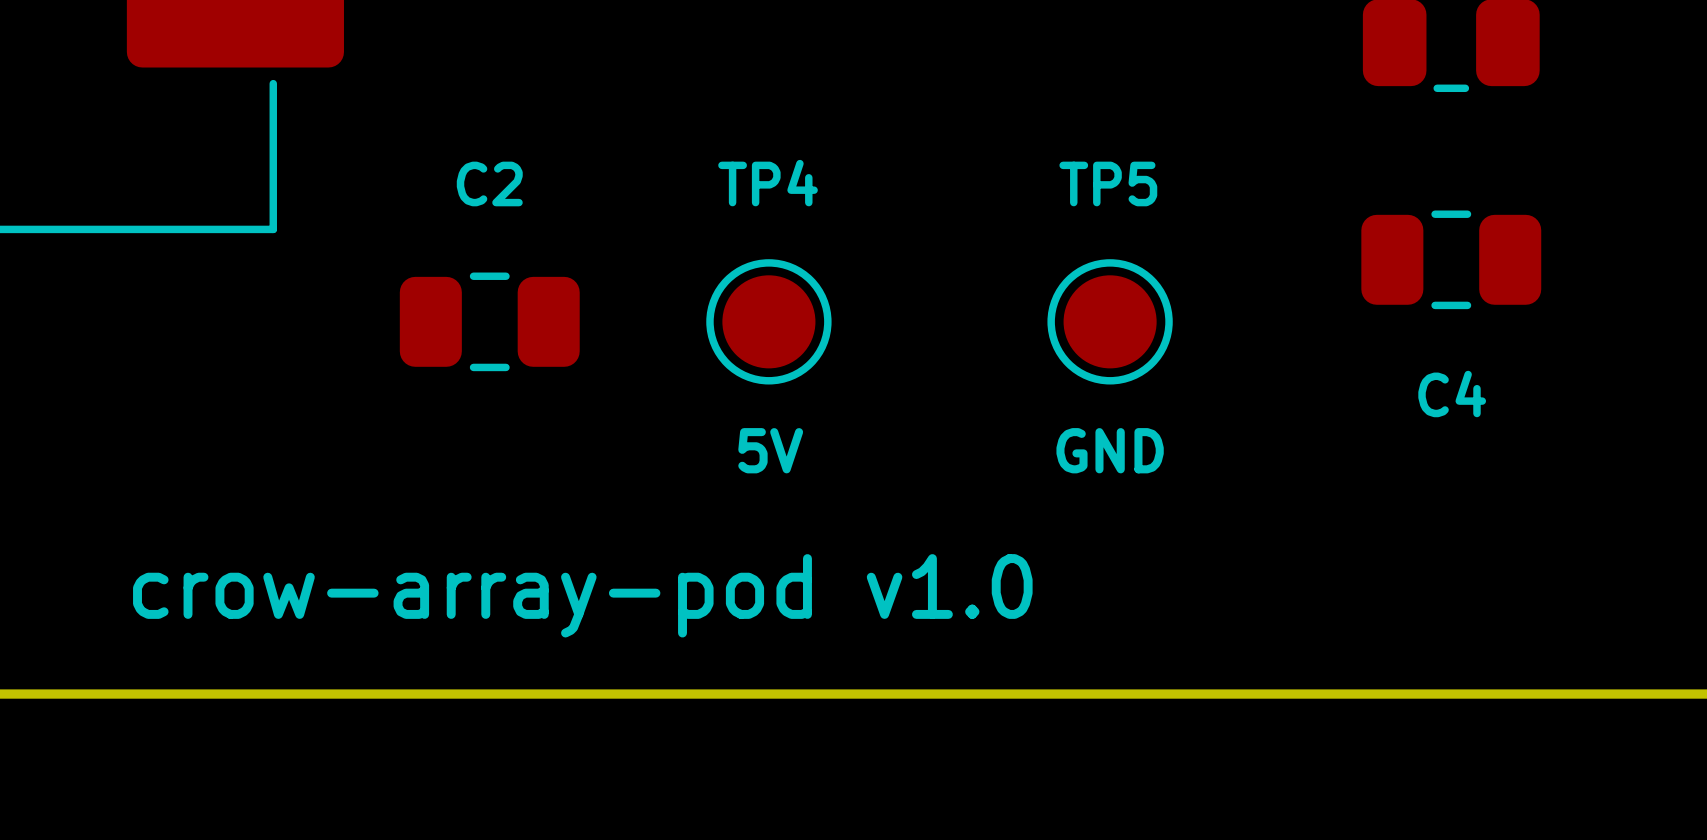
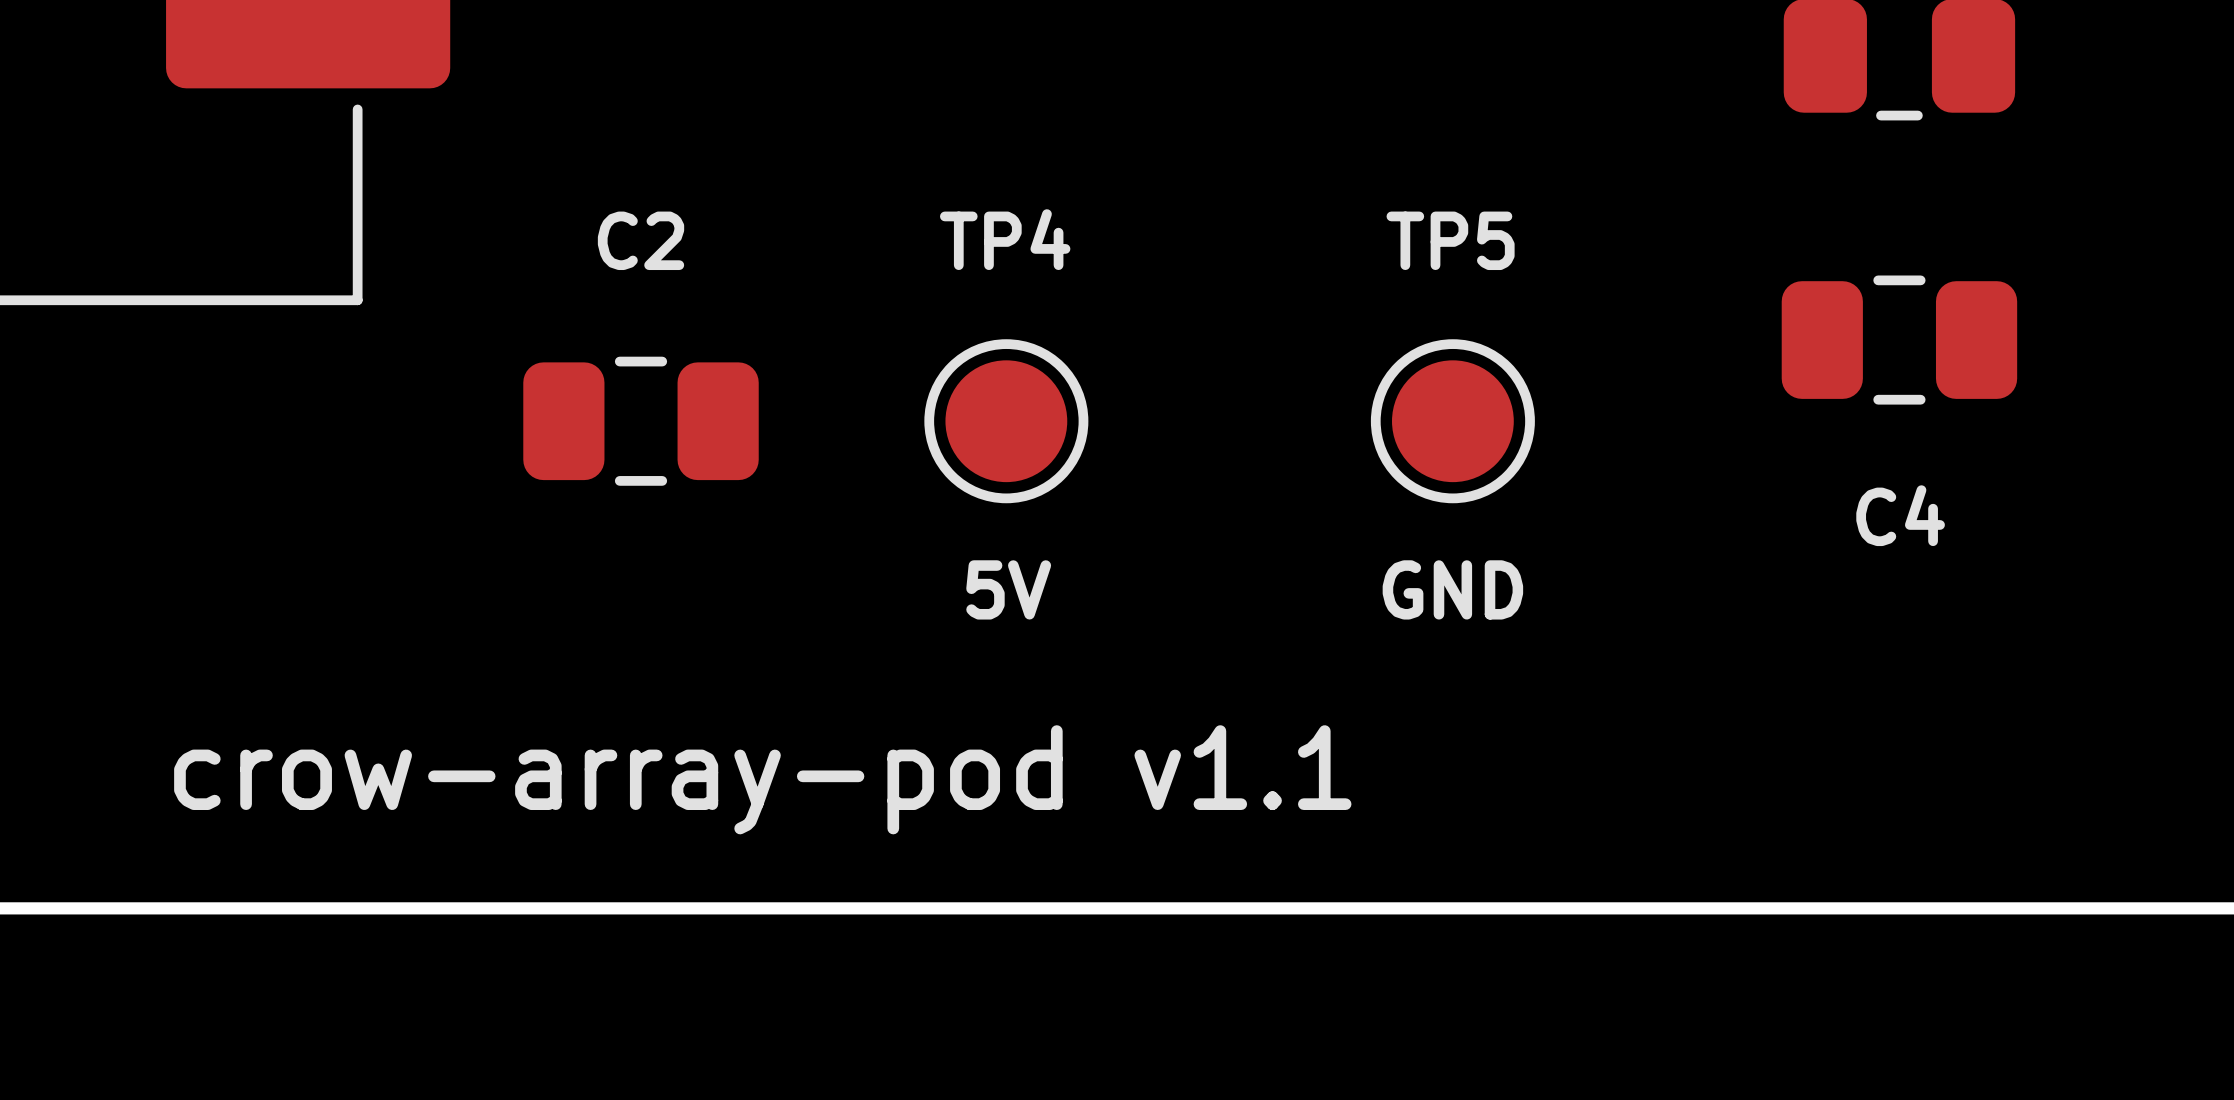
text: crow-array-pod v1.0 (582, 595) -> crow-array-pod v1.1 (762, 779)

